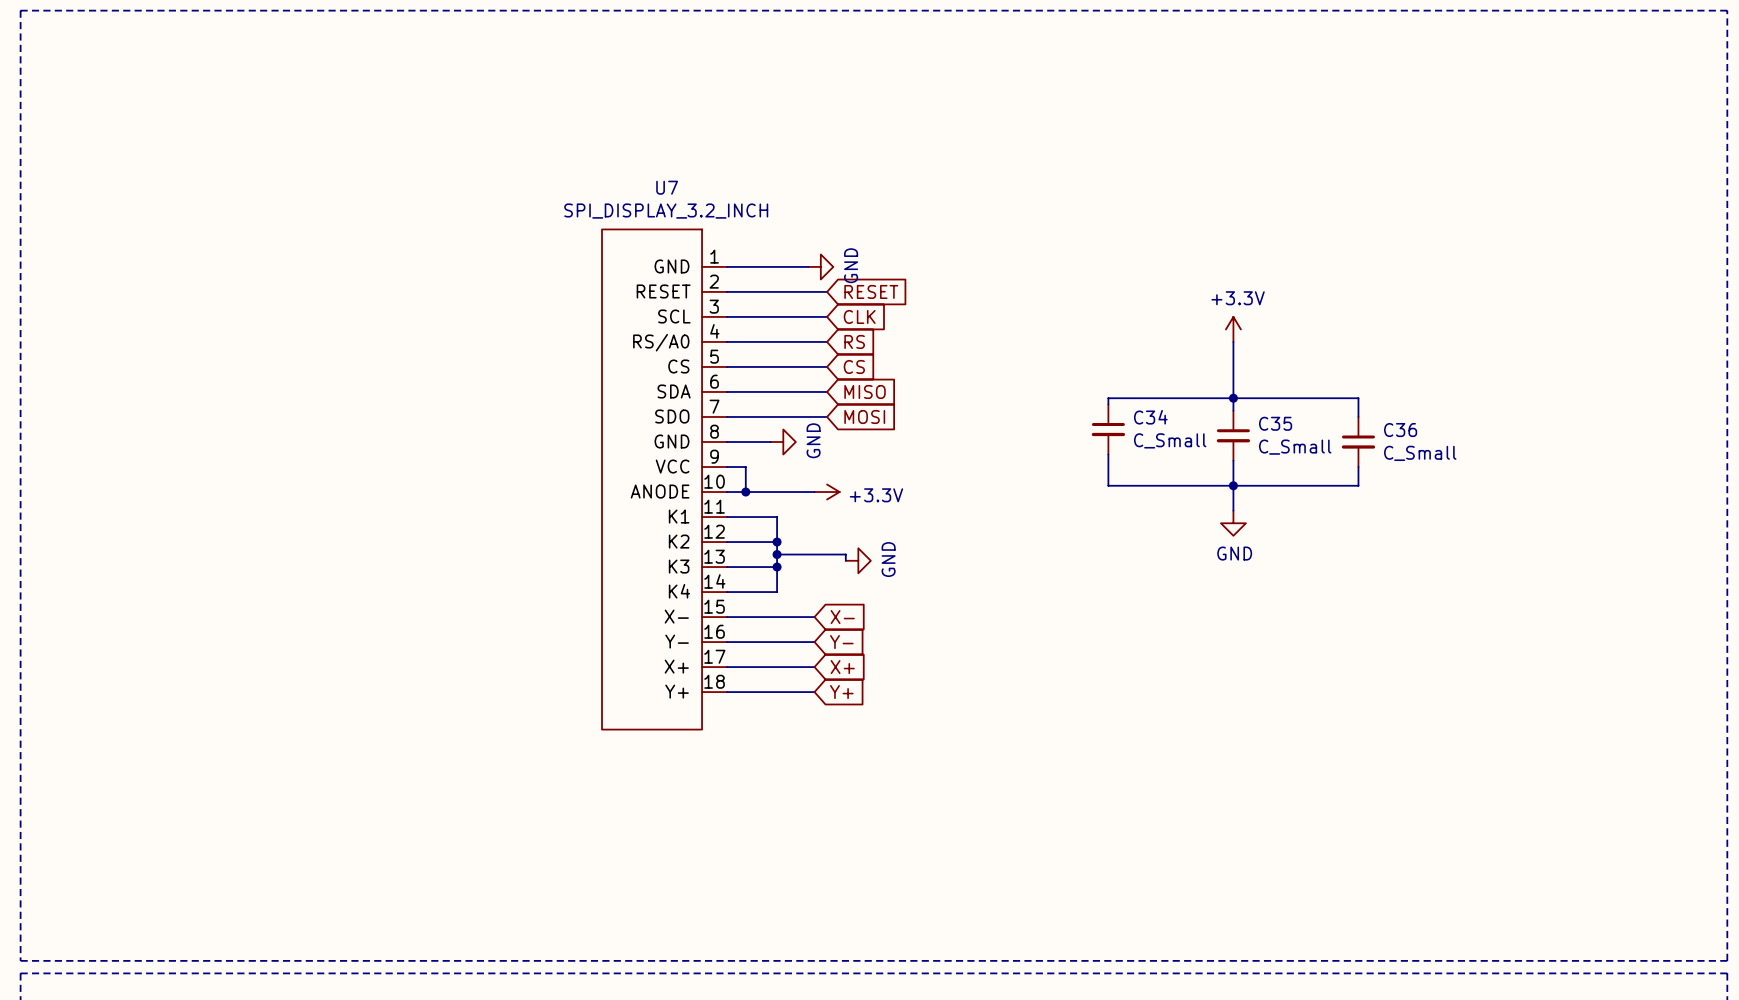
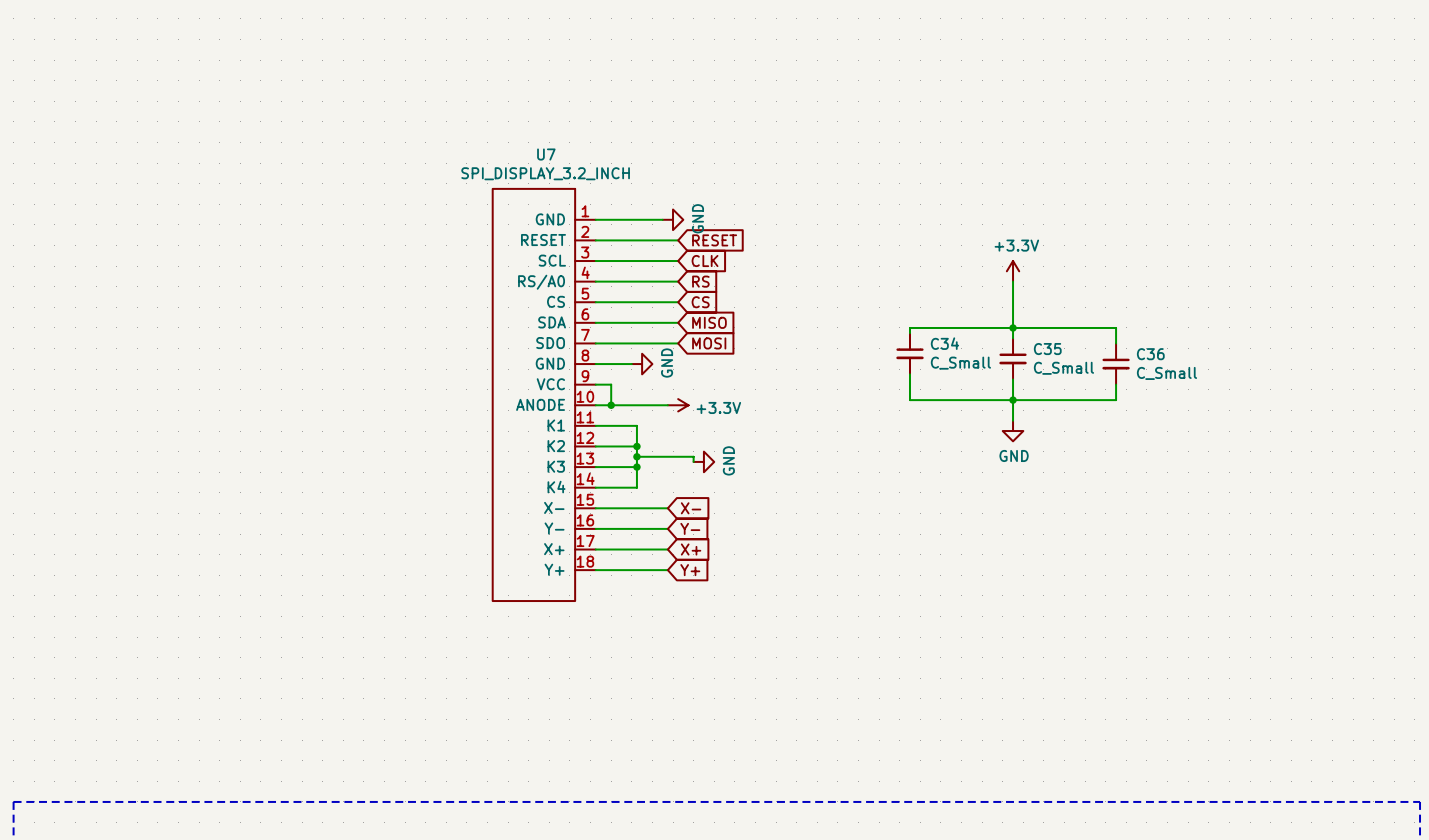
line: (20, 10) (1727, 10) (1727, 960) (20, 960) (20, 10) -> none

